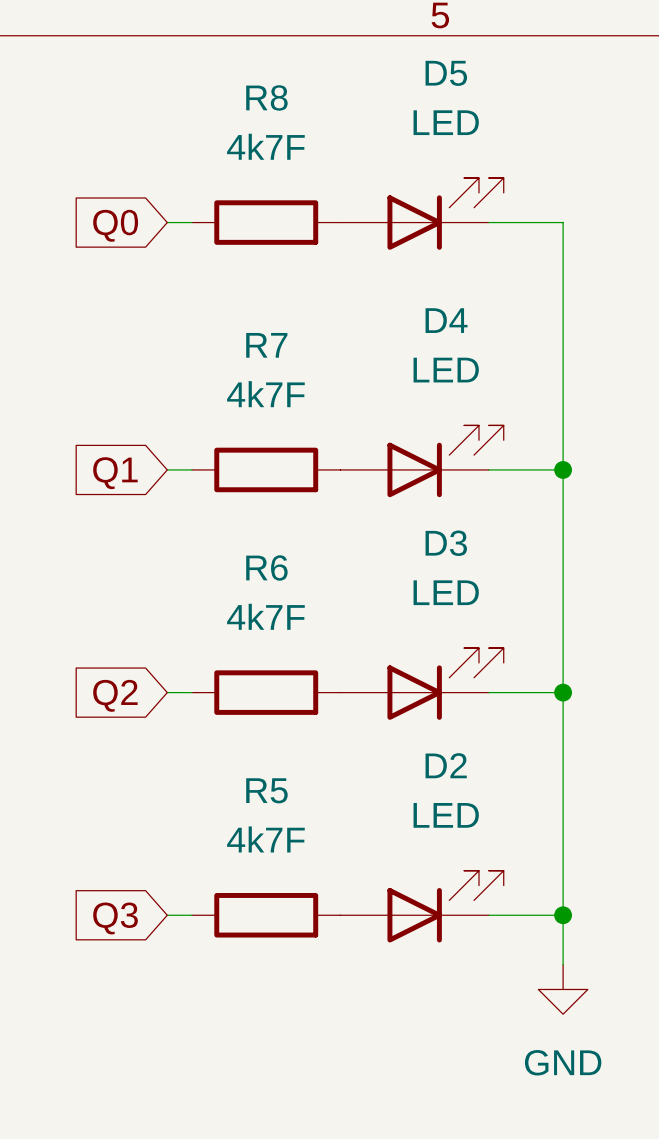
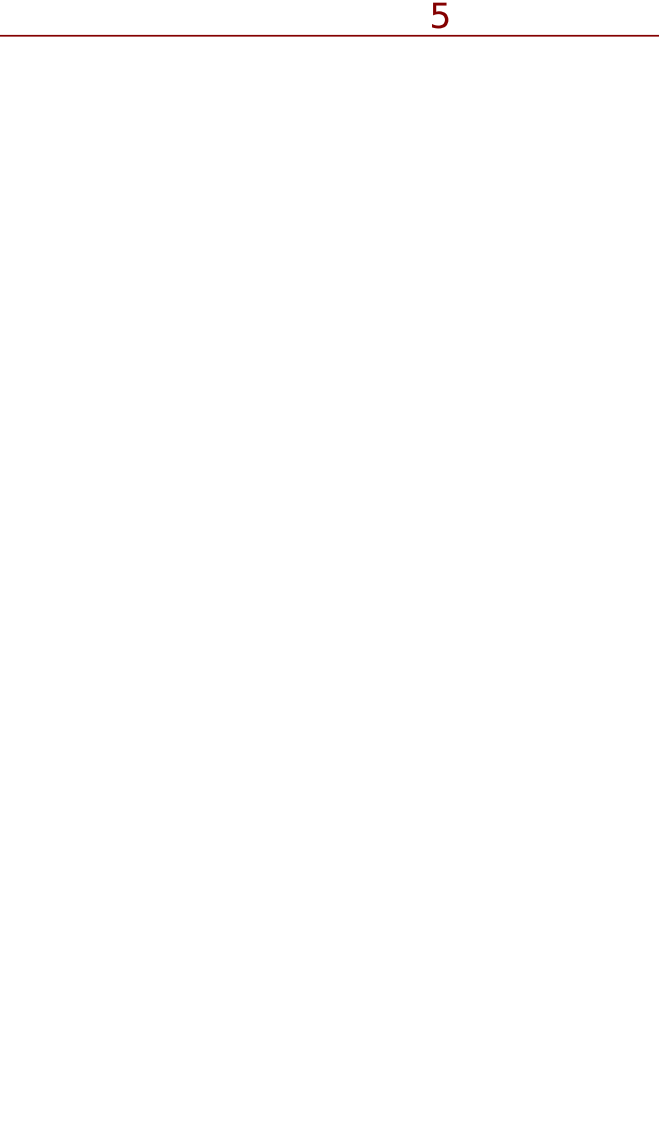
D5: LED (422, 213) -> none
wire: (167, 222) (192, 222) -> none
R8: 4k7F (266, 222) -> none
wire: (488, 222) (563, 222) (563, 964) -> none
global label: Q0 (115, 225) -> none
D4: LED (422, 461) -> none
wire: (167, 469) (192, 469) -> none
R7: 4k7F (266, 469) -> none
wire: (488, 469) (563, 469) -> none
junction: (563, 469) -> none
global label: Q1 (115, 473) -> none
D3: LED (422, 683) -> none
wire: (167, 692) (192, 692) -> none
R6: 4k7F (266, 692) -> none
wire: (488, 692) (563, 692) -> none
junction: (563, 692) -> none
global label: Q2 (115, 695) -> none
D2: LED (422, 906) -> none
wire: (167, 915) (192, 915) -> none
R5: 4k7F (266, 915) -> none
wire: (488, 915) (563, 915) -> none
junction: (563, 915) -> none
global label: Q3 (115, 918) -> none
power symbol: GND (563, 989) -> none

